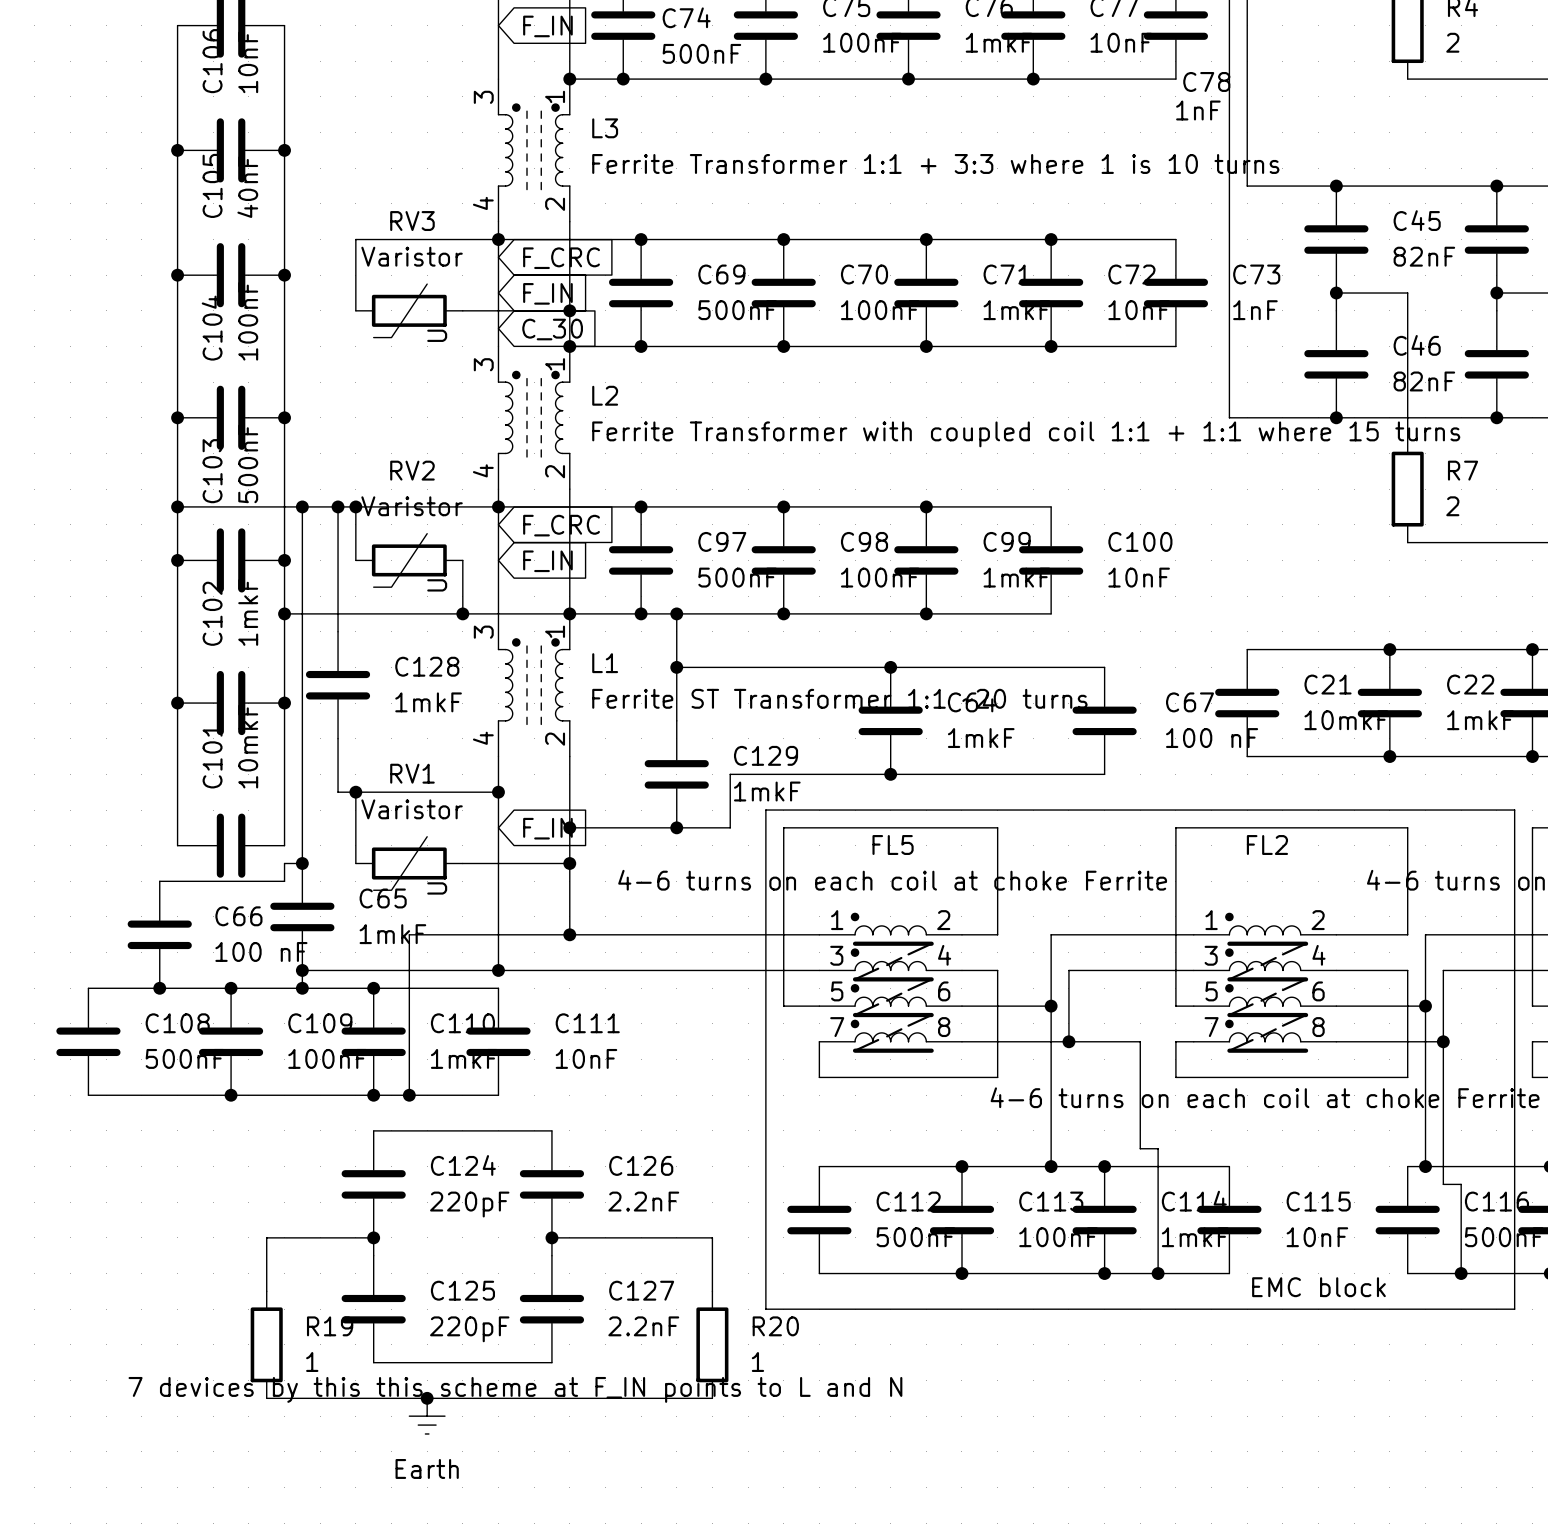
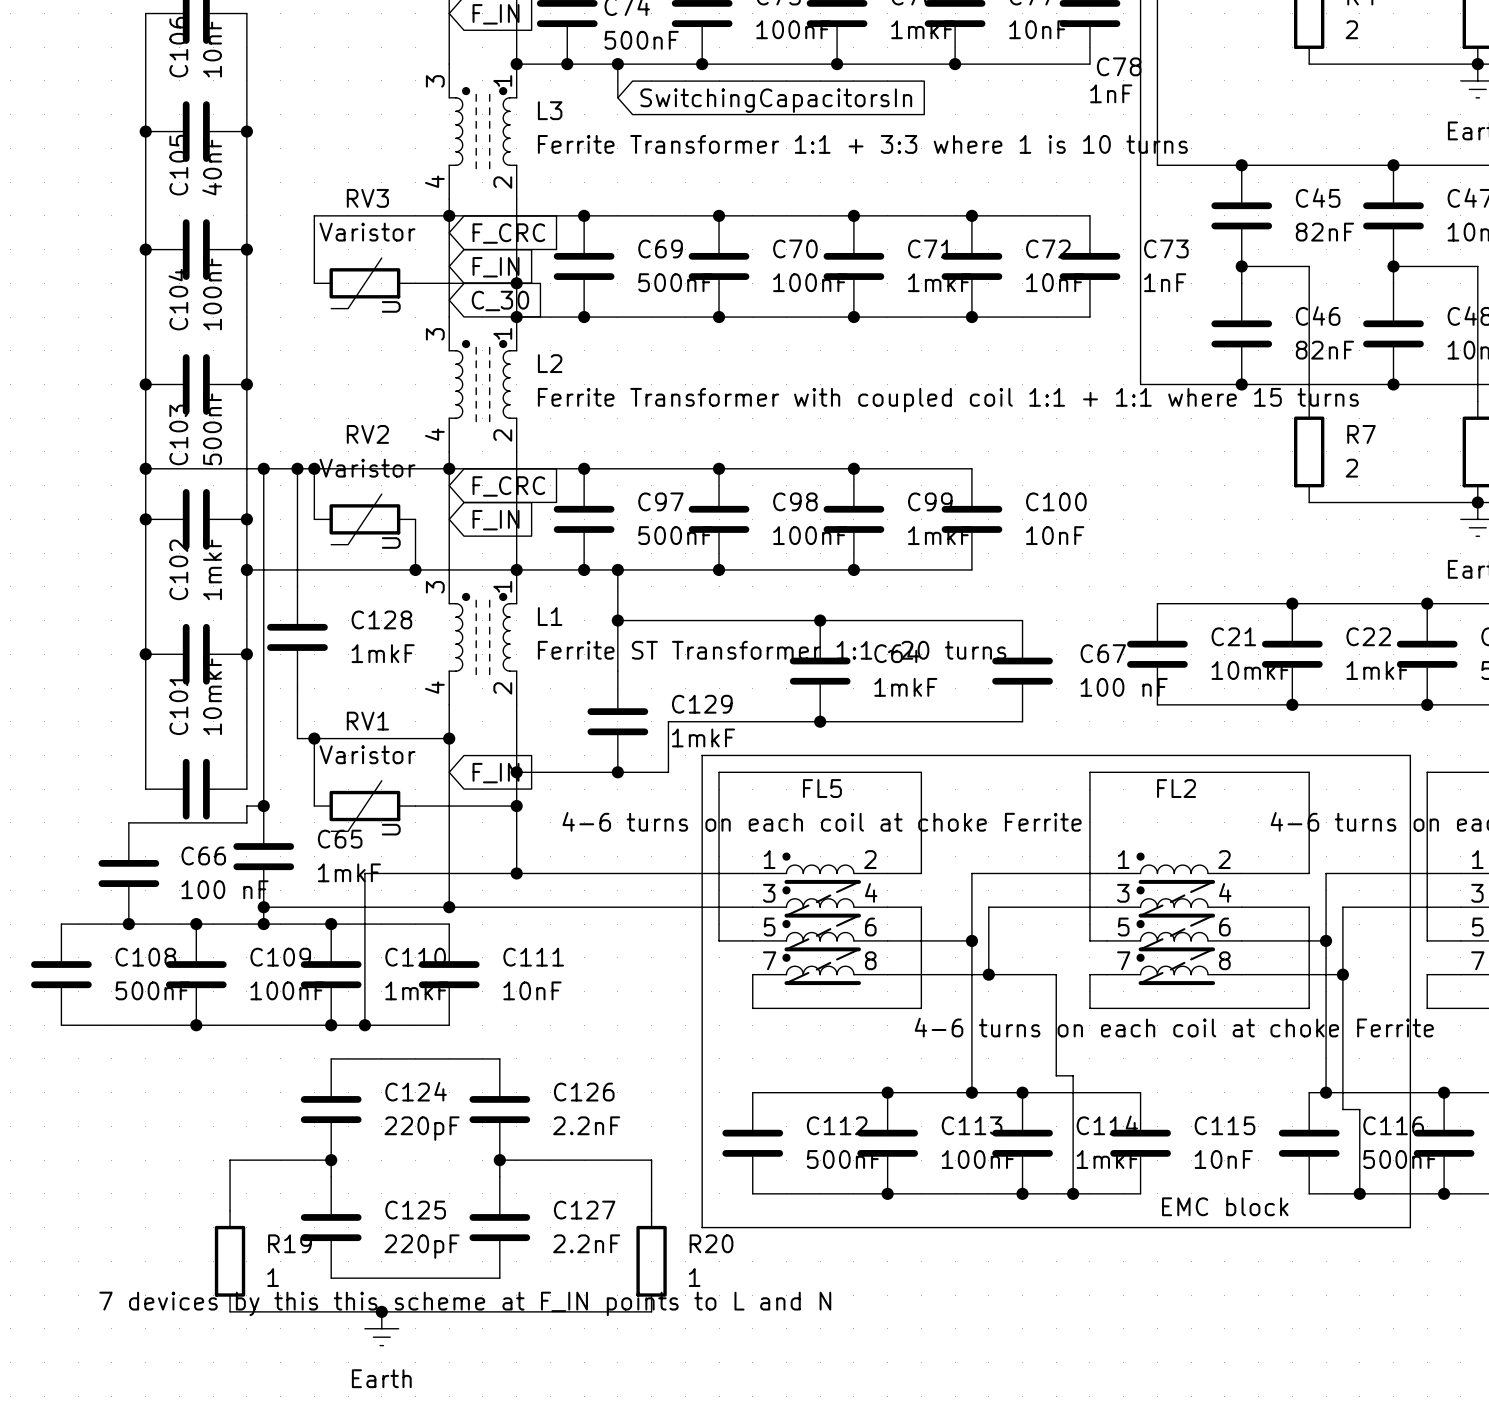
wire: none -> (617, 64) (617, 97)
junction: none -> (617, 64)
global label: none -> SwitchingCapacitorsIn (776, 100)

